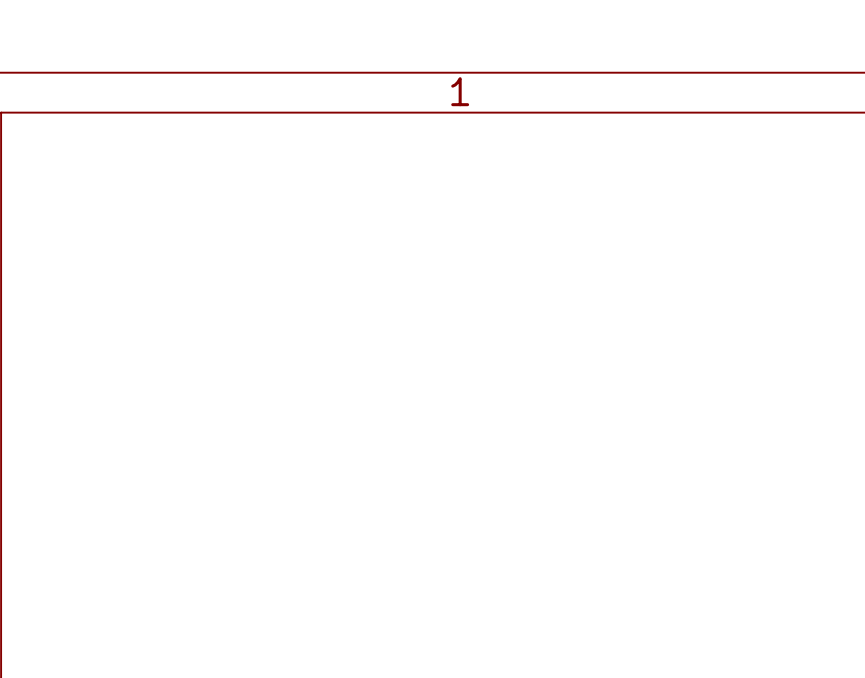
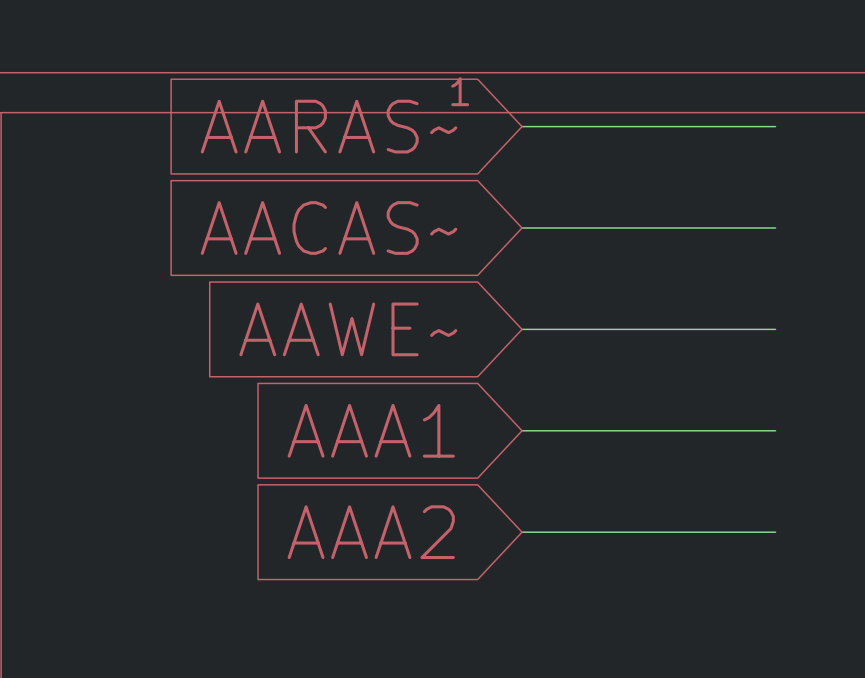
global label: none -> AARAS~ (329, 126)
wire: none -> (522, 126) (775, 126)
global label: none -> AACAS~ (329, 227)
wire: none -> (522, 227) (775, 227)
global label: none -> AAWE~ (348, 329)
wire: none -> (522, 329) (775, 329)
global label: none -> AAA1 (371, 430)
wire: none -> (522, 430) (775, 430)
global label: none -> AAA2 (371, 532)
wire: none -> (522, 532) (775, 532)

